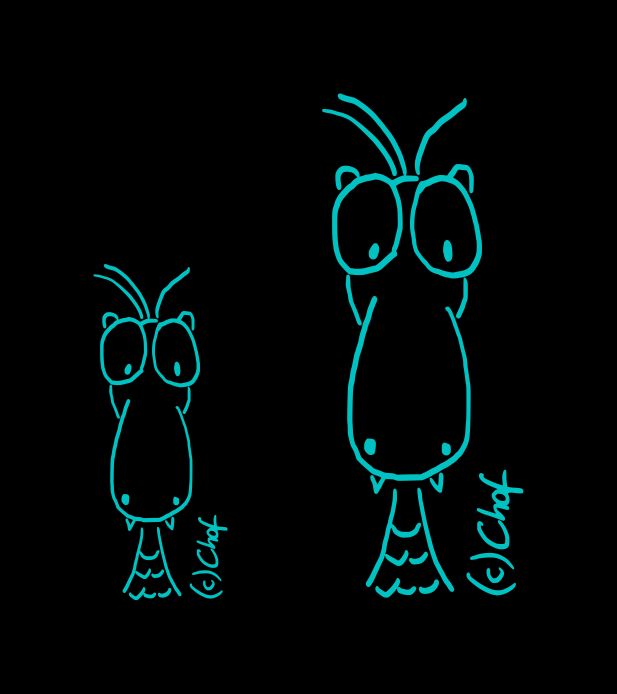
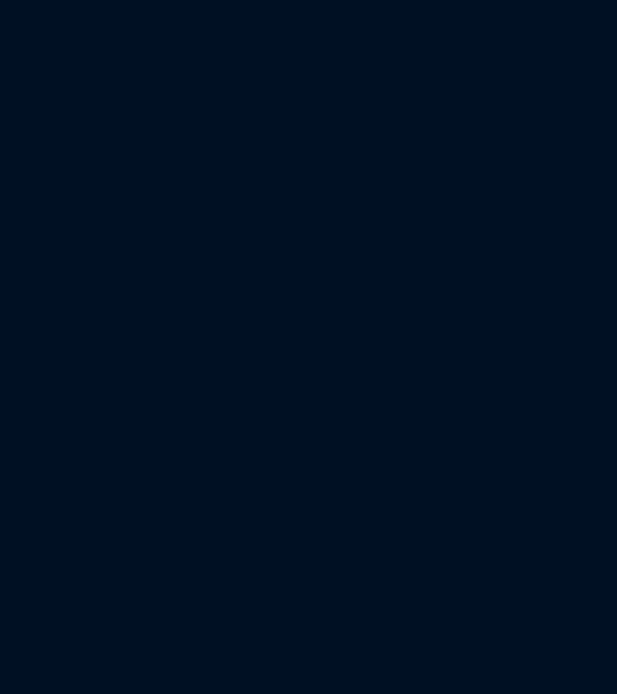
drawing: [322, 93, 524, 598] -> none
drawing: [93, 263, 228, 601] -> none

